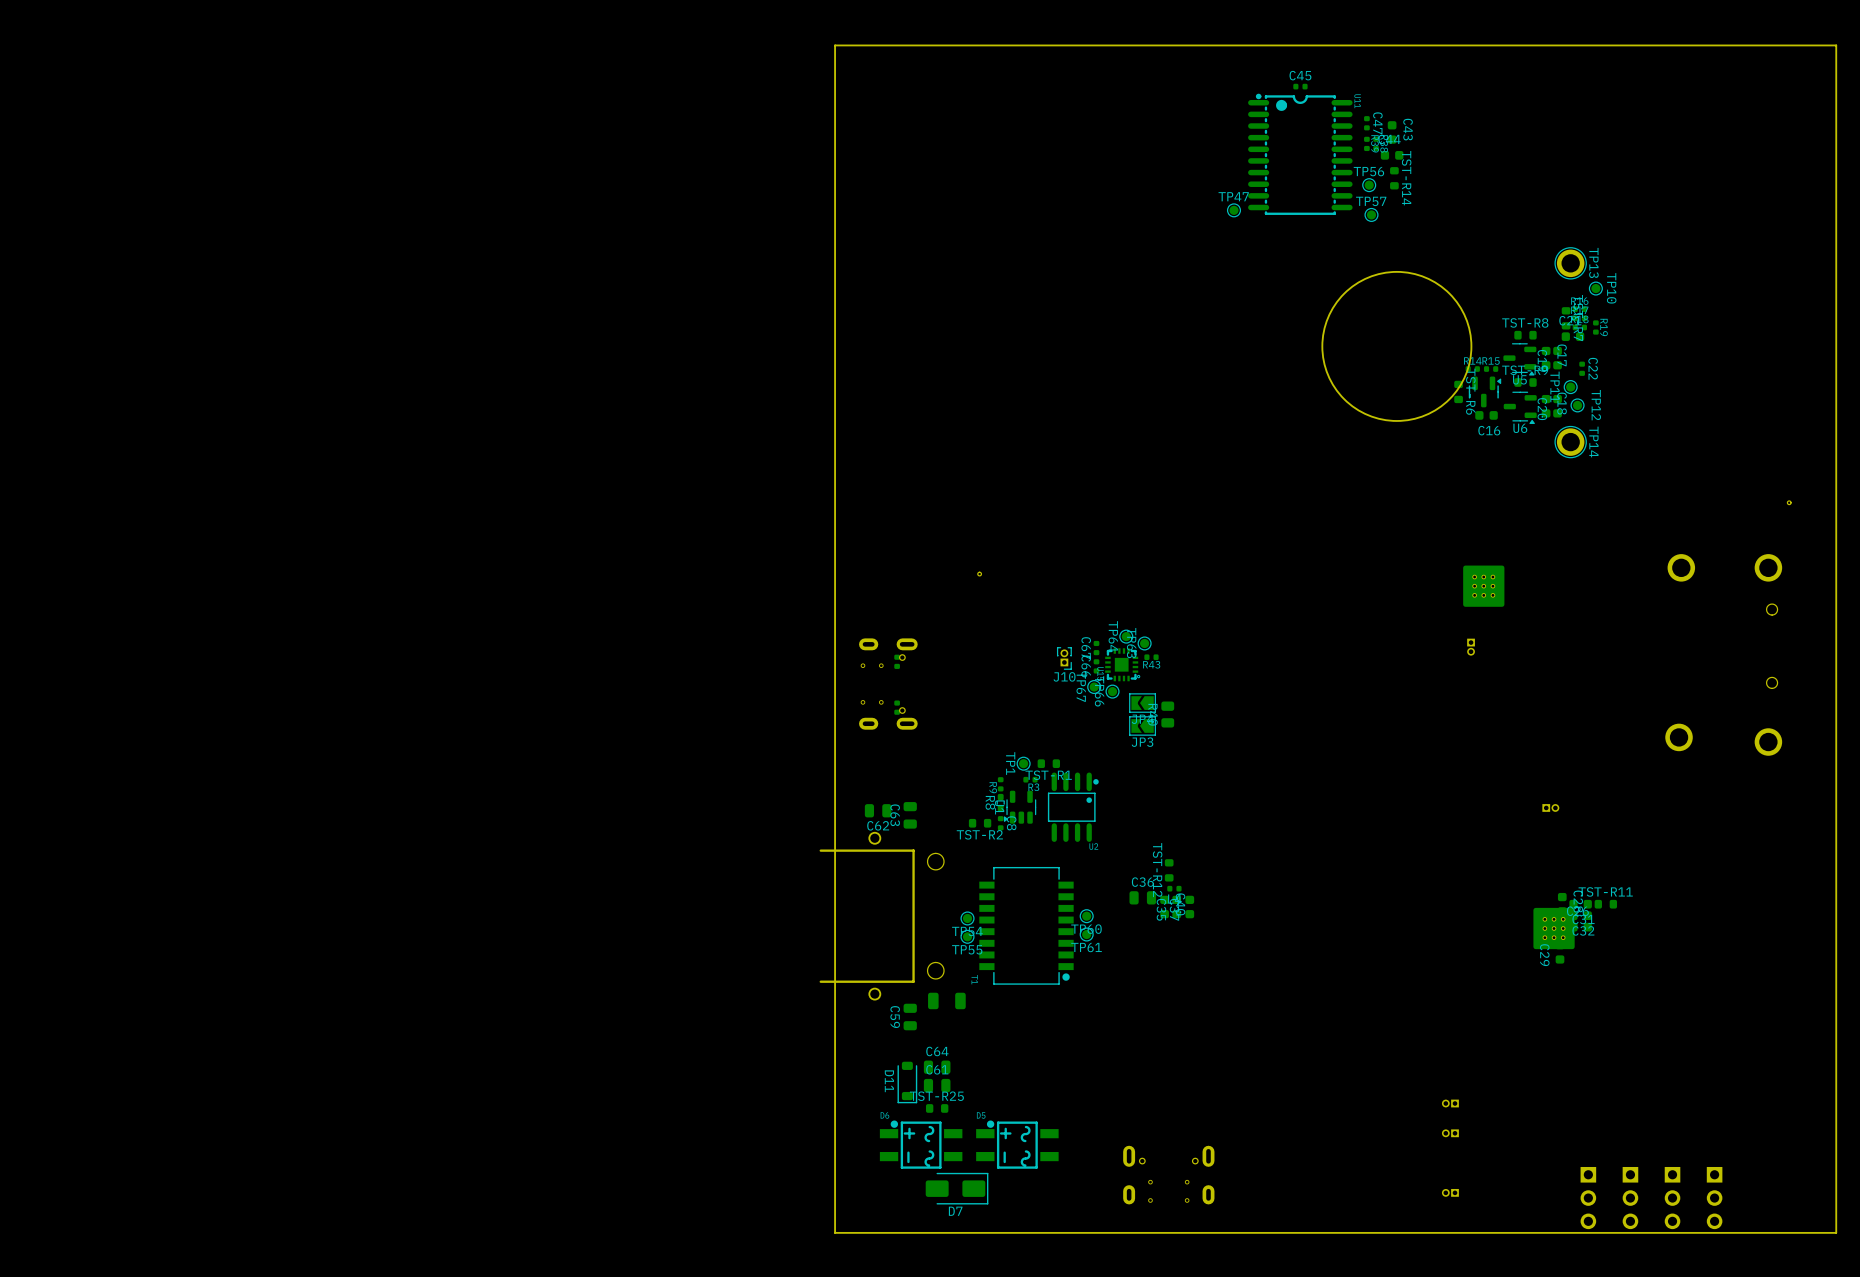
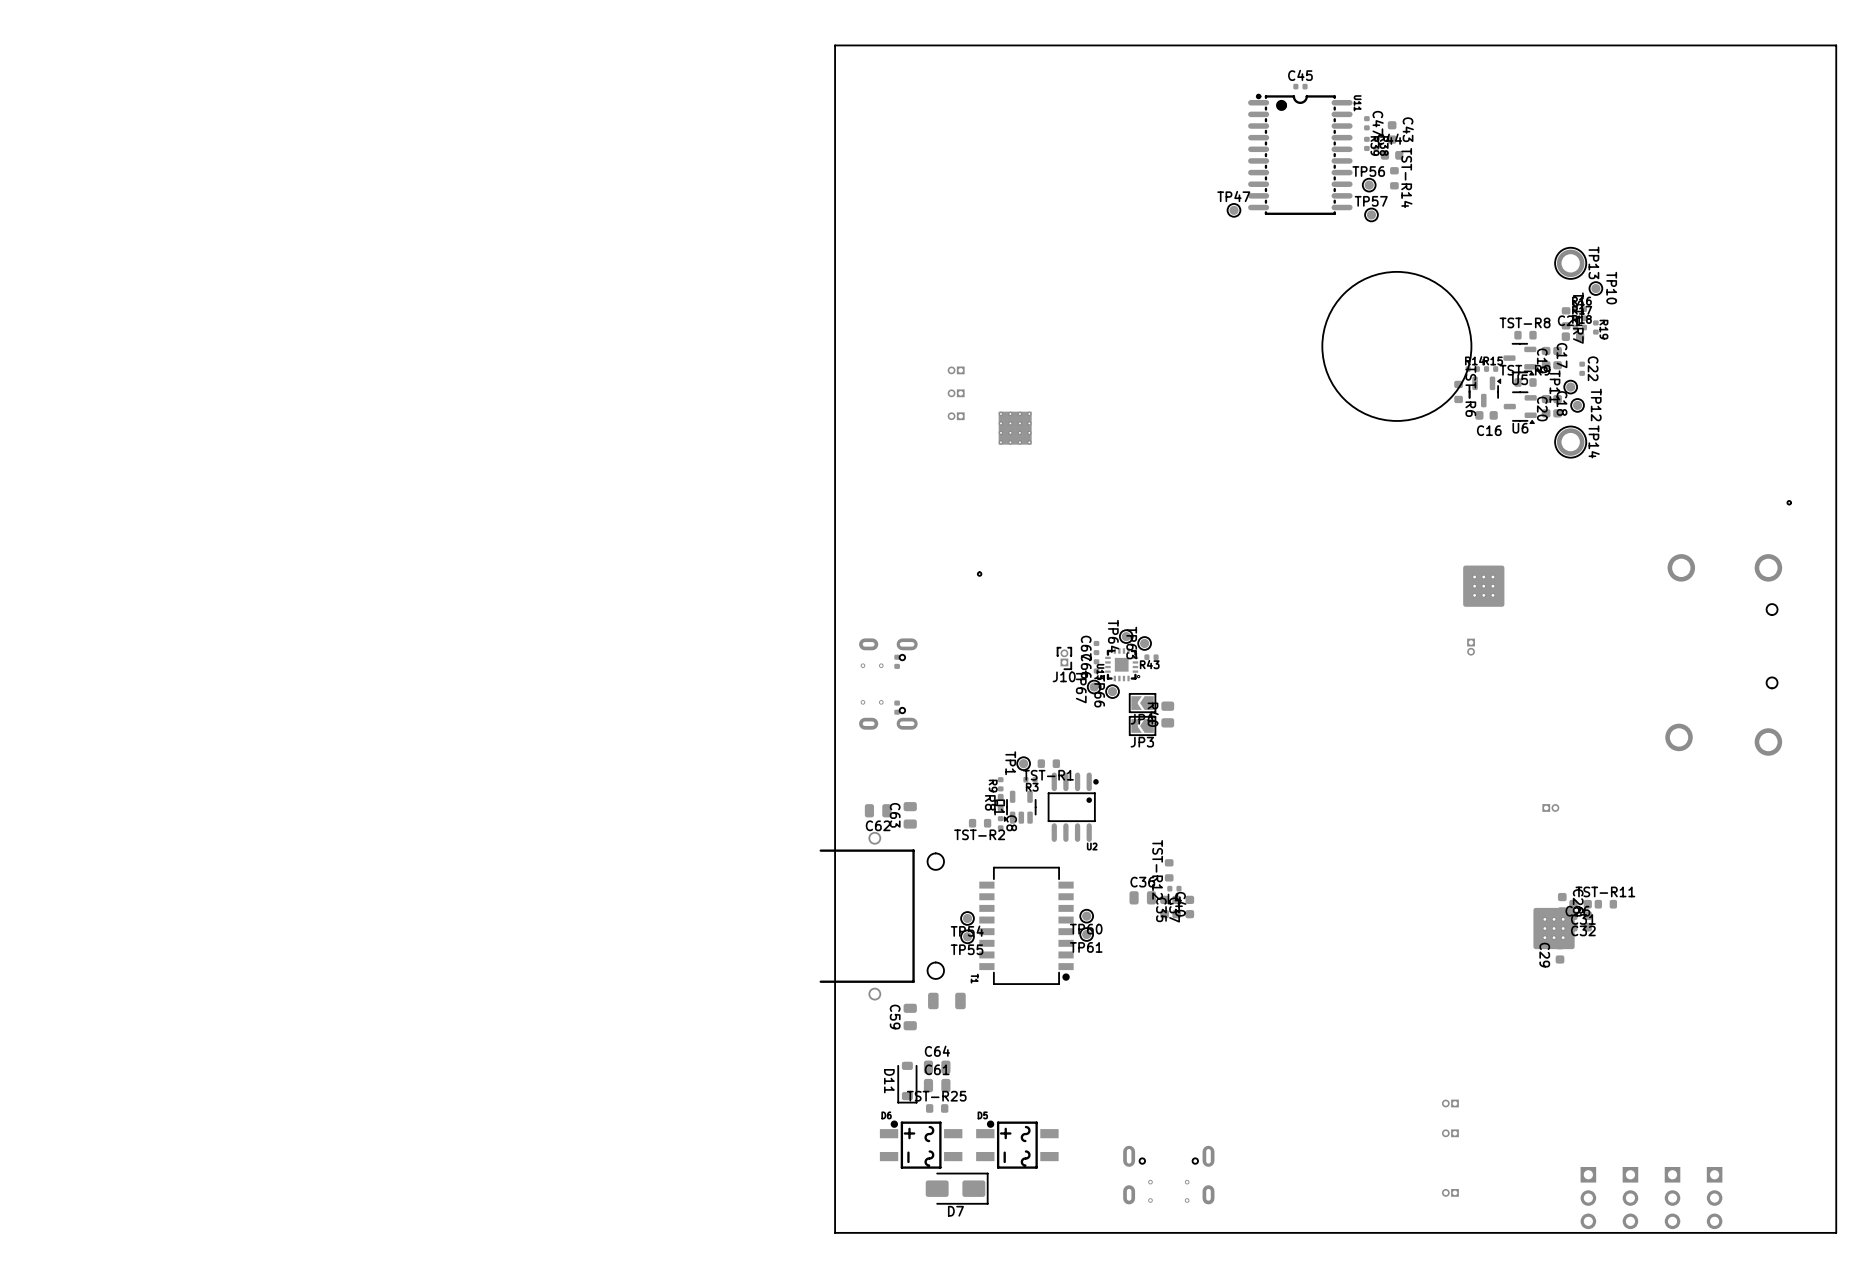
part: none -> (956, 370)
part: none -> (956, 393)
part: none -> (956, 416)
part: none -> (1015, 428)

